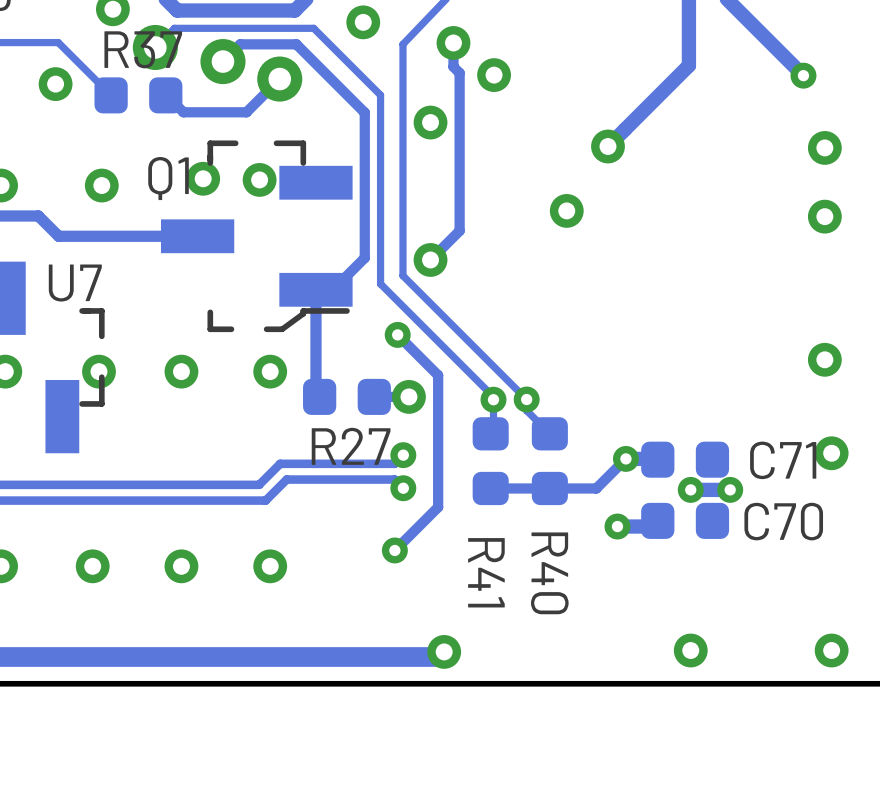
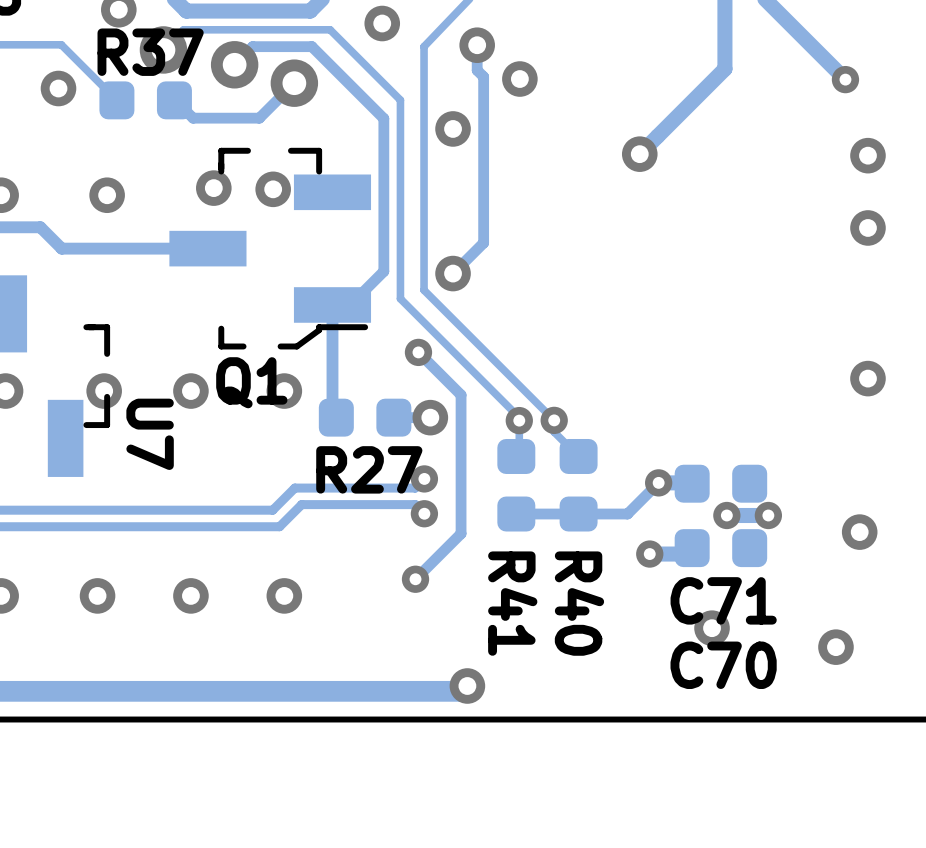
Q1 name position: Q1 (168, 178) -> Q1 (251, 382)
via: (566, 210) -> none
U7 name rotation: 0° (75, 283) -> 90° clockwise (150, 434)
U7 name position: U7 (75, 283) -> U7 (150, 434)
via: (831, 453) -> none
C71 name position: C71 (783, 460) -> C71 (723, 600)
via: none -> (859, 532)
C70 name position: C70 (783, 521) -> C70 (723, 665)
via: none -> (712, 628)
via: (690, 650) -> none
via position: (831, 650) -> (835, 647)

